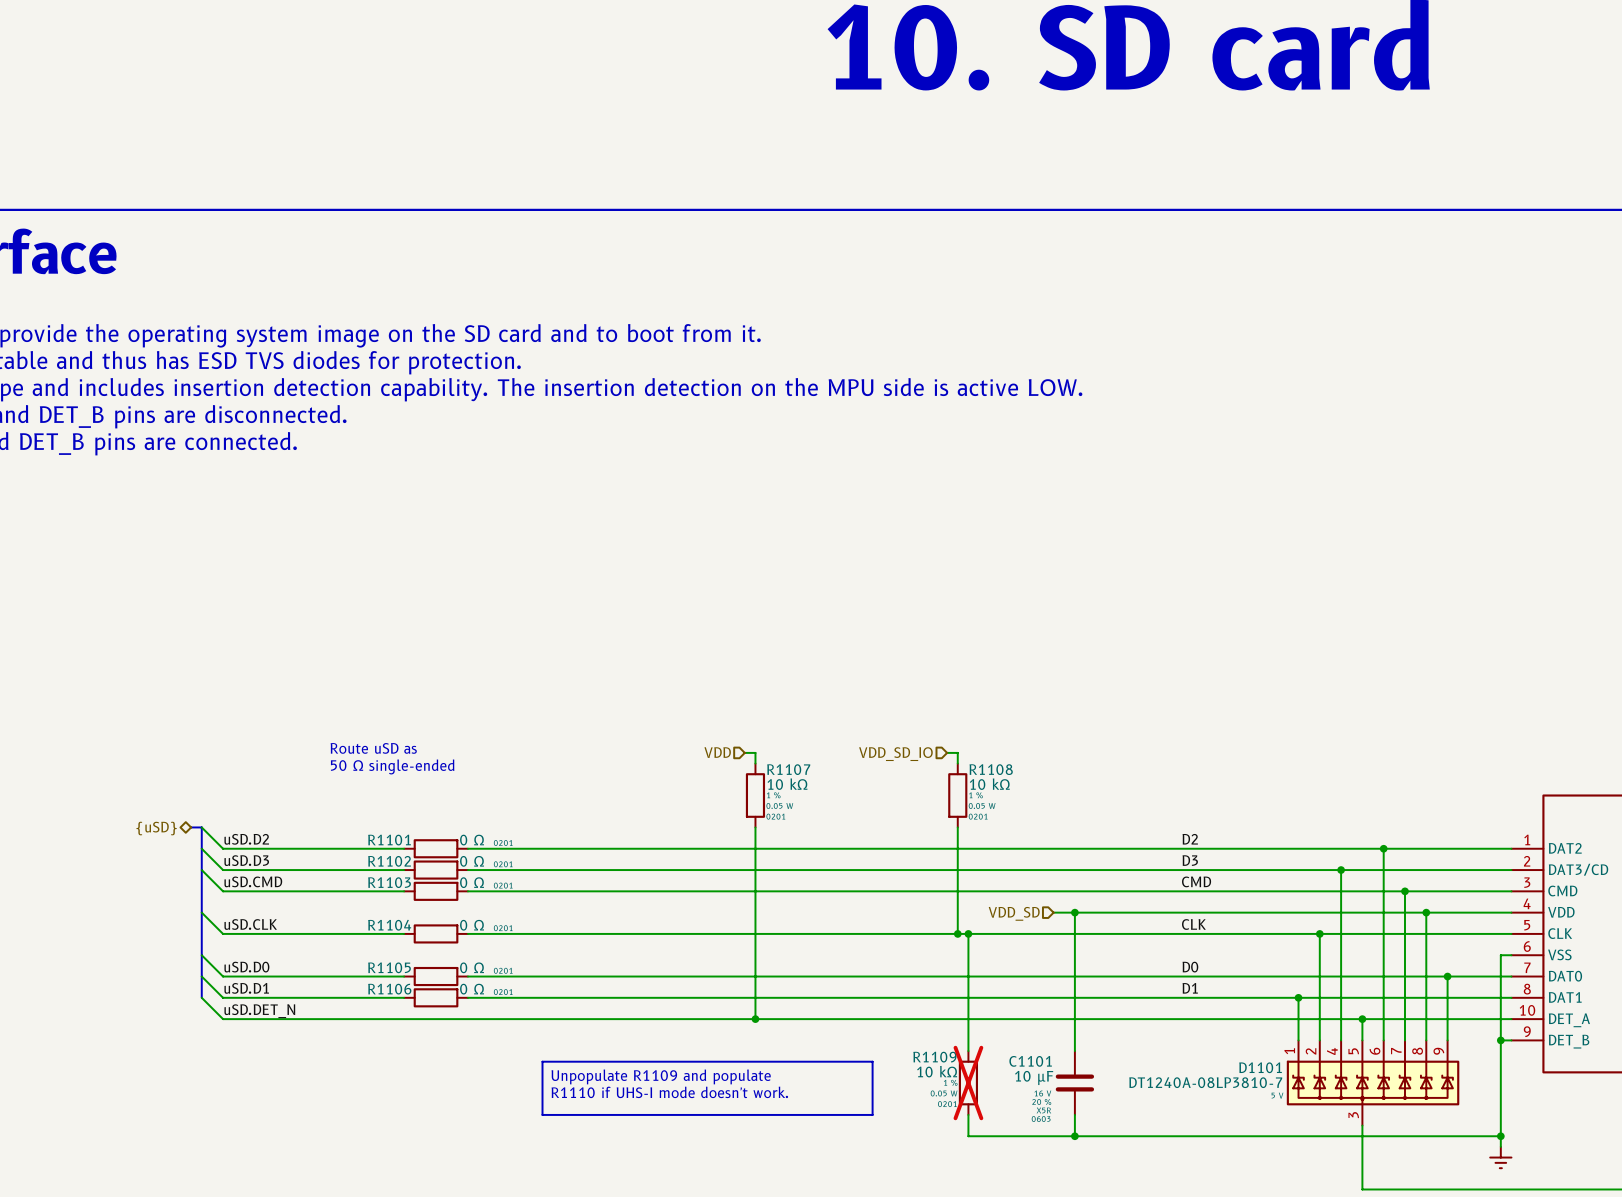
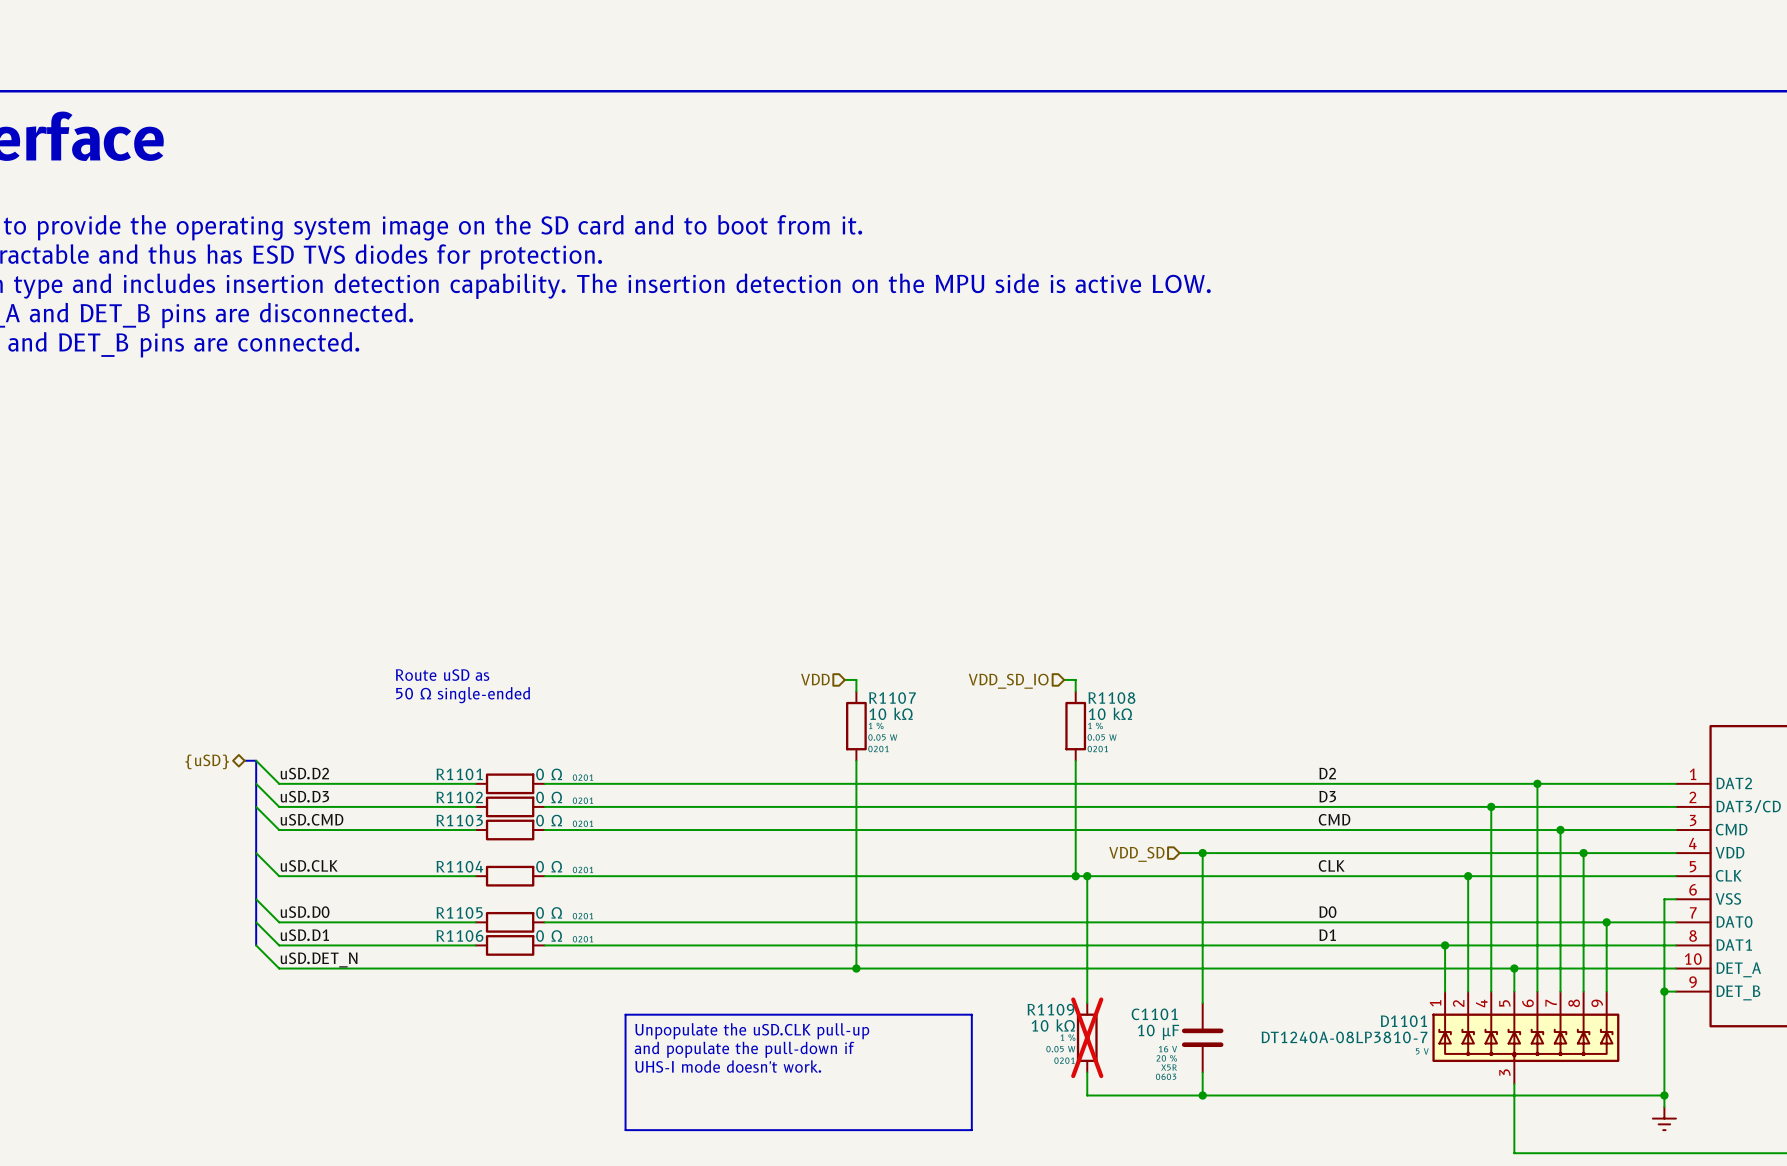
line: (861, 1061) (872, 1061) (872, 1114) (542, 1114) -> (971, 1014) (971, 1130) (625, 1130) (625, 1072)
text: Unpopulate R1109 and populate (661, 1076) -> Unpopulate the uSD.CLK pull-up (752, 1031)
text: R1110 if UHS-I mode doesn't work. (669, 1092) -> and populate the pull-down if (744, 1049)
text: none -> UHS-I mode doesn't work. (728, 1066)

